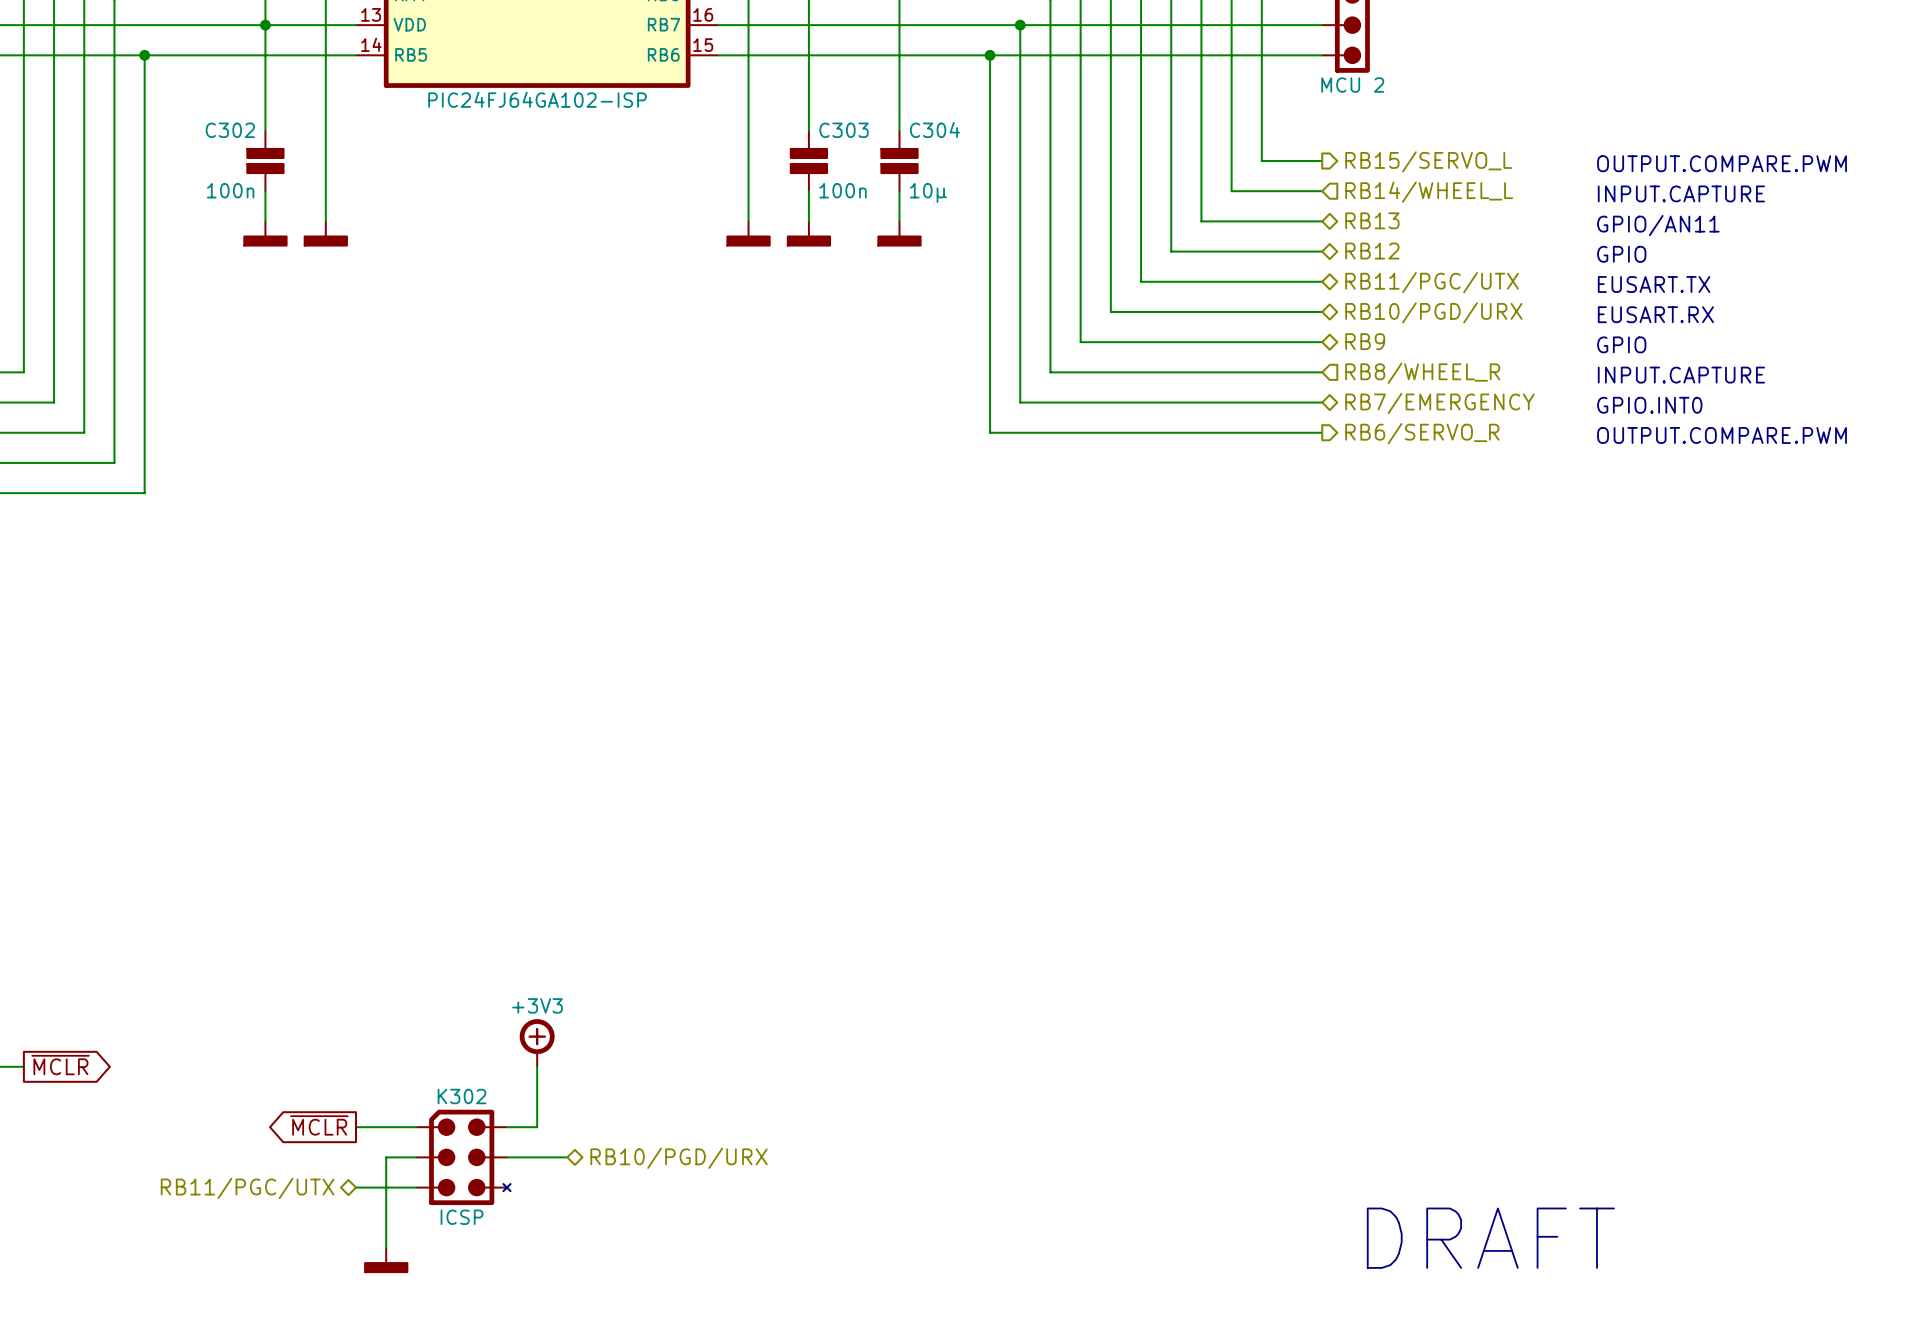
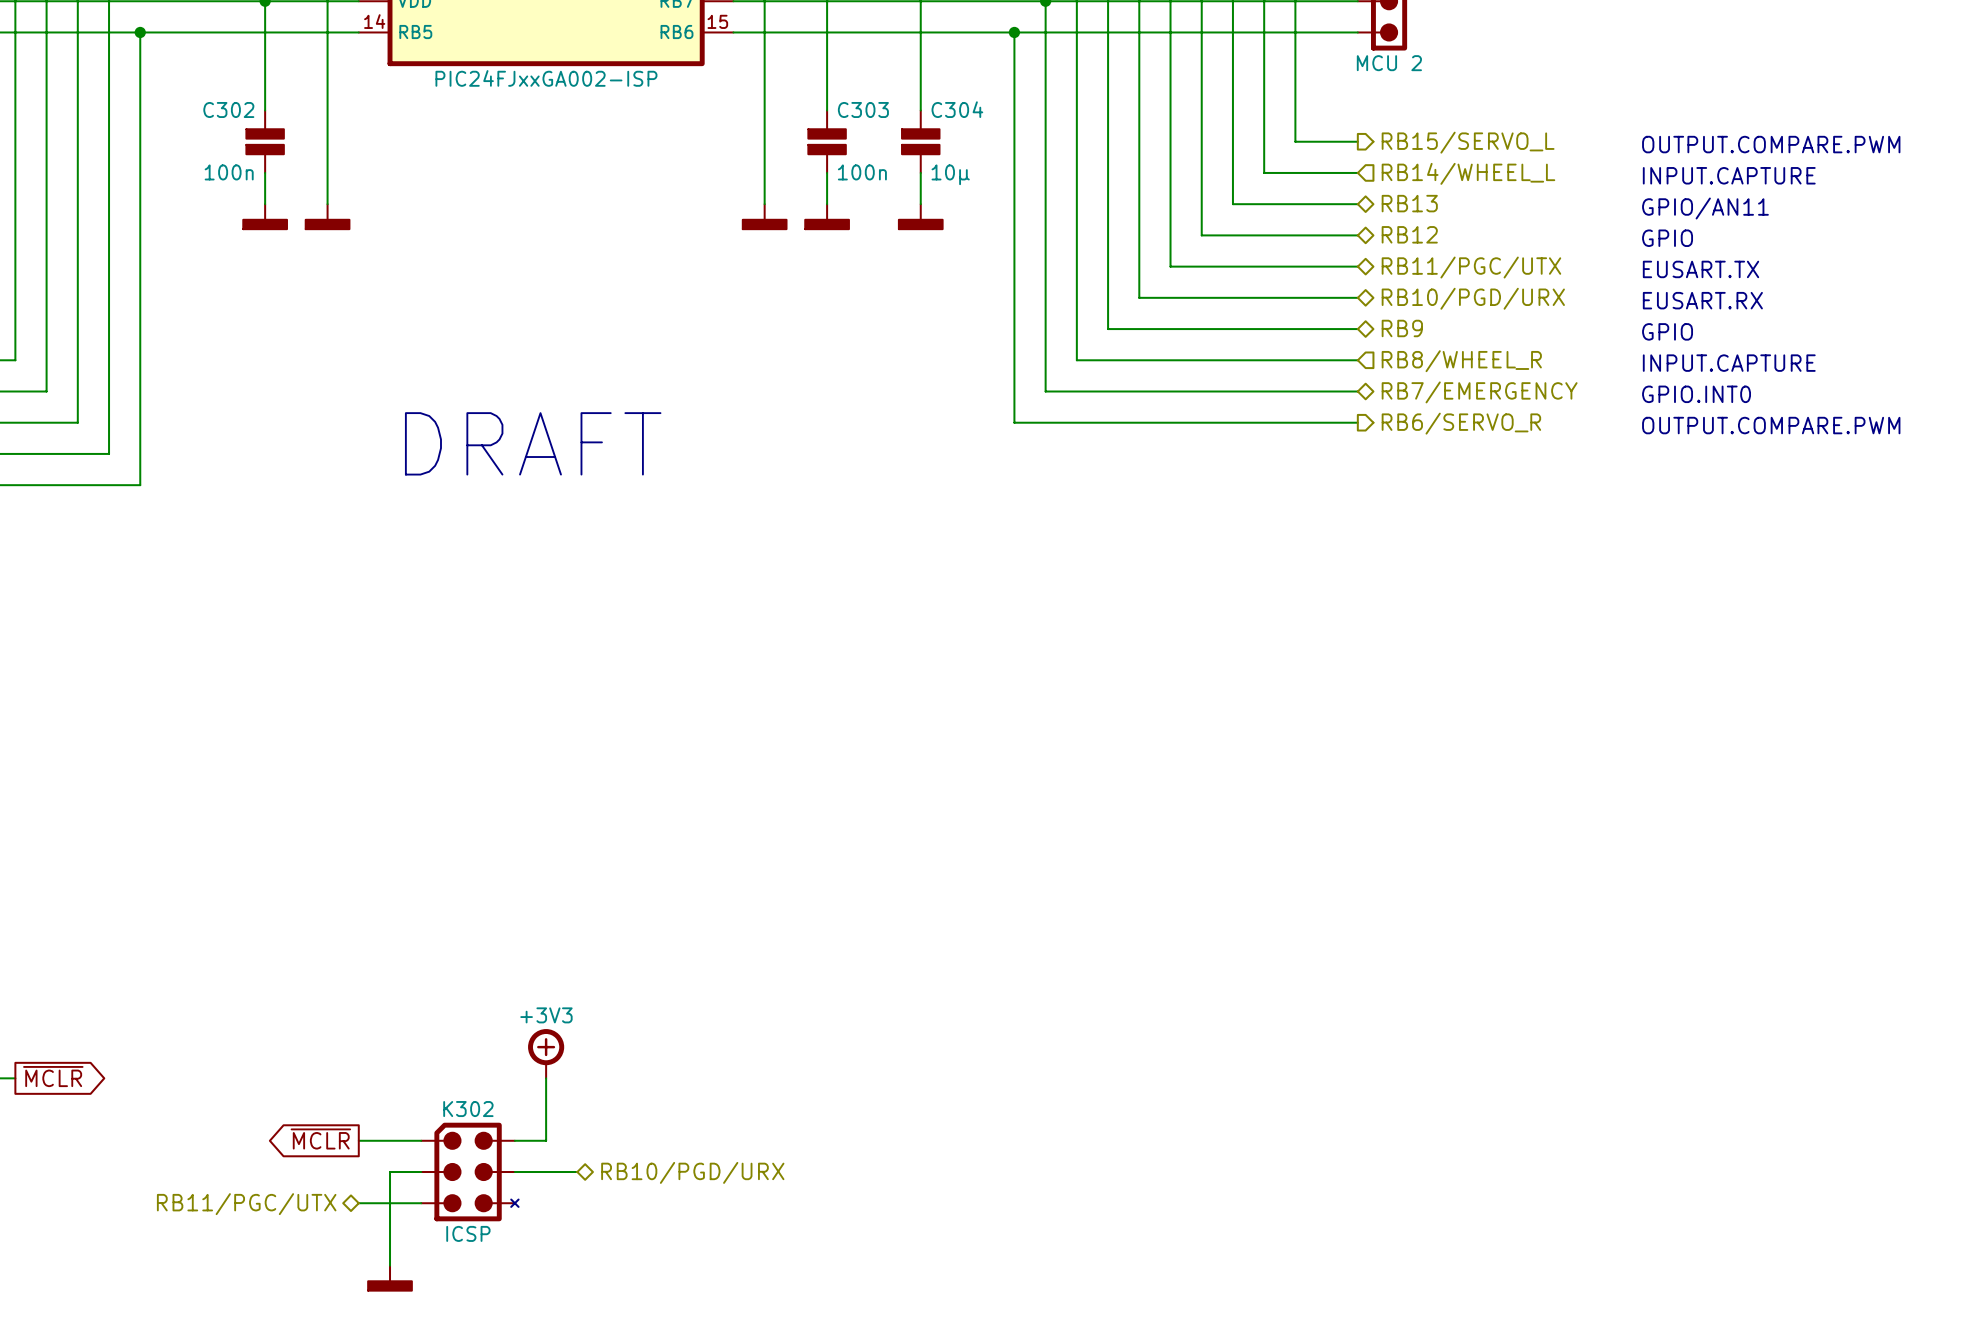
part text: PIC24FJ64GA102-ISP (537, 99) -> none
part value: none -> PIC24FJxxGA002-ISP (546, 78)
text: none -> DRAFT (533, 443)
text: DRAFT (1490, 1238) -> none

